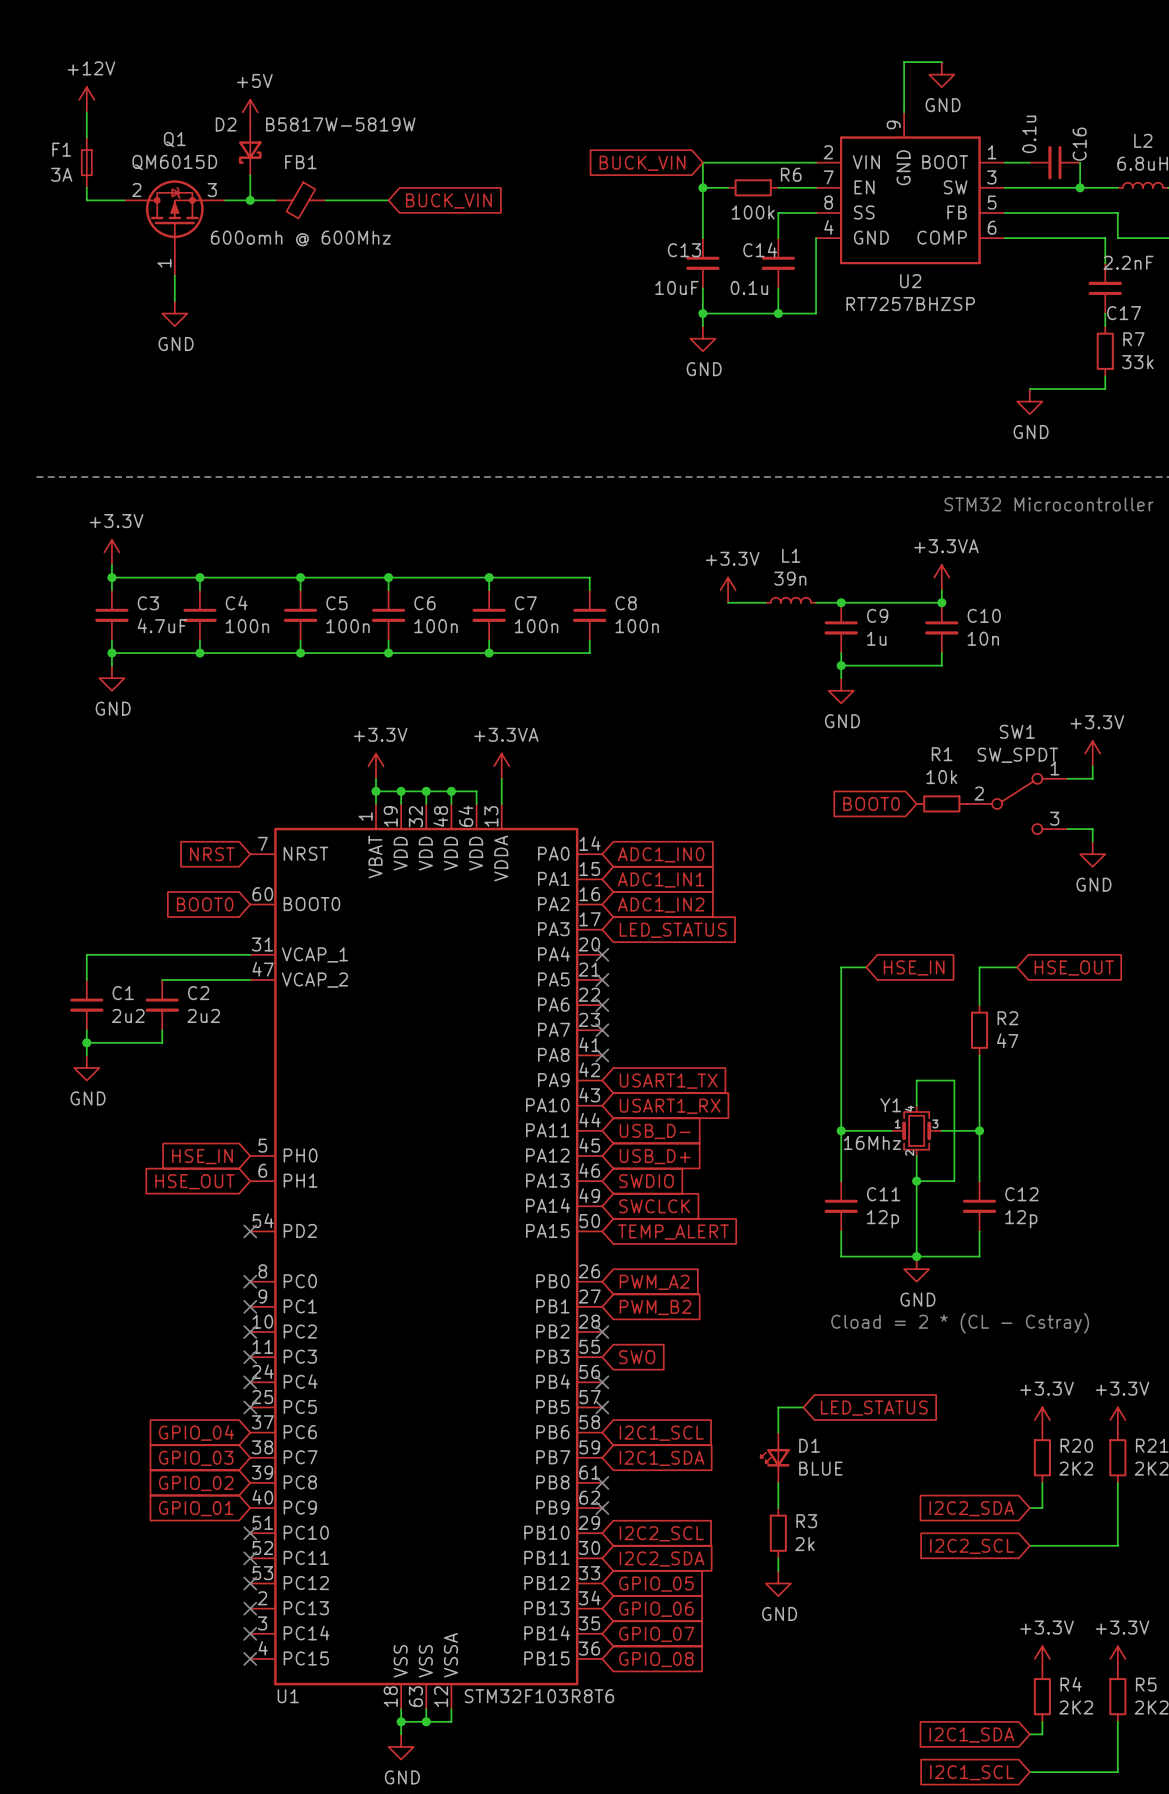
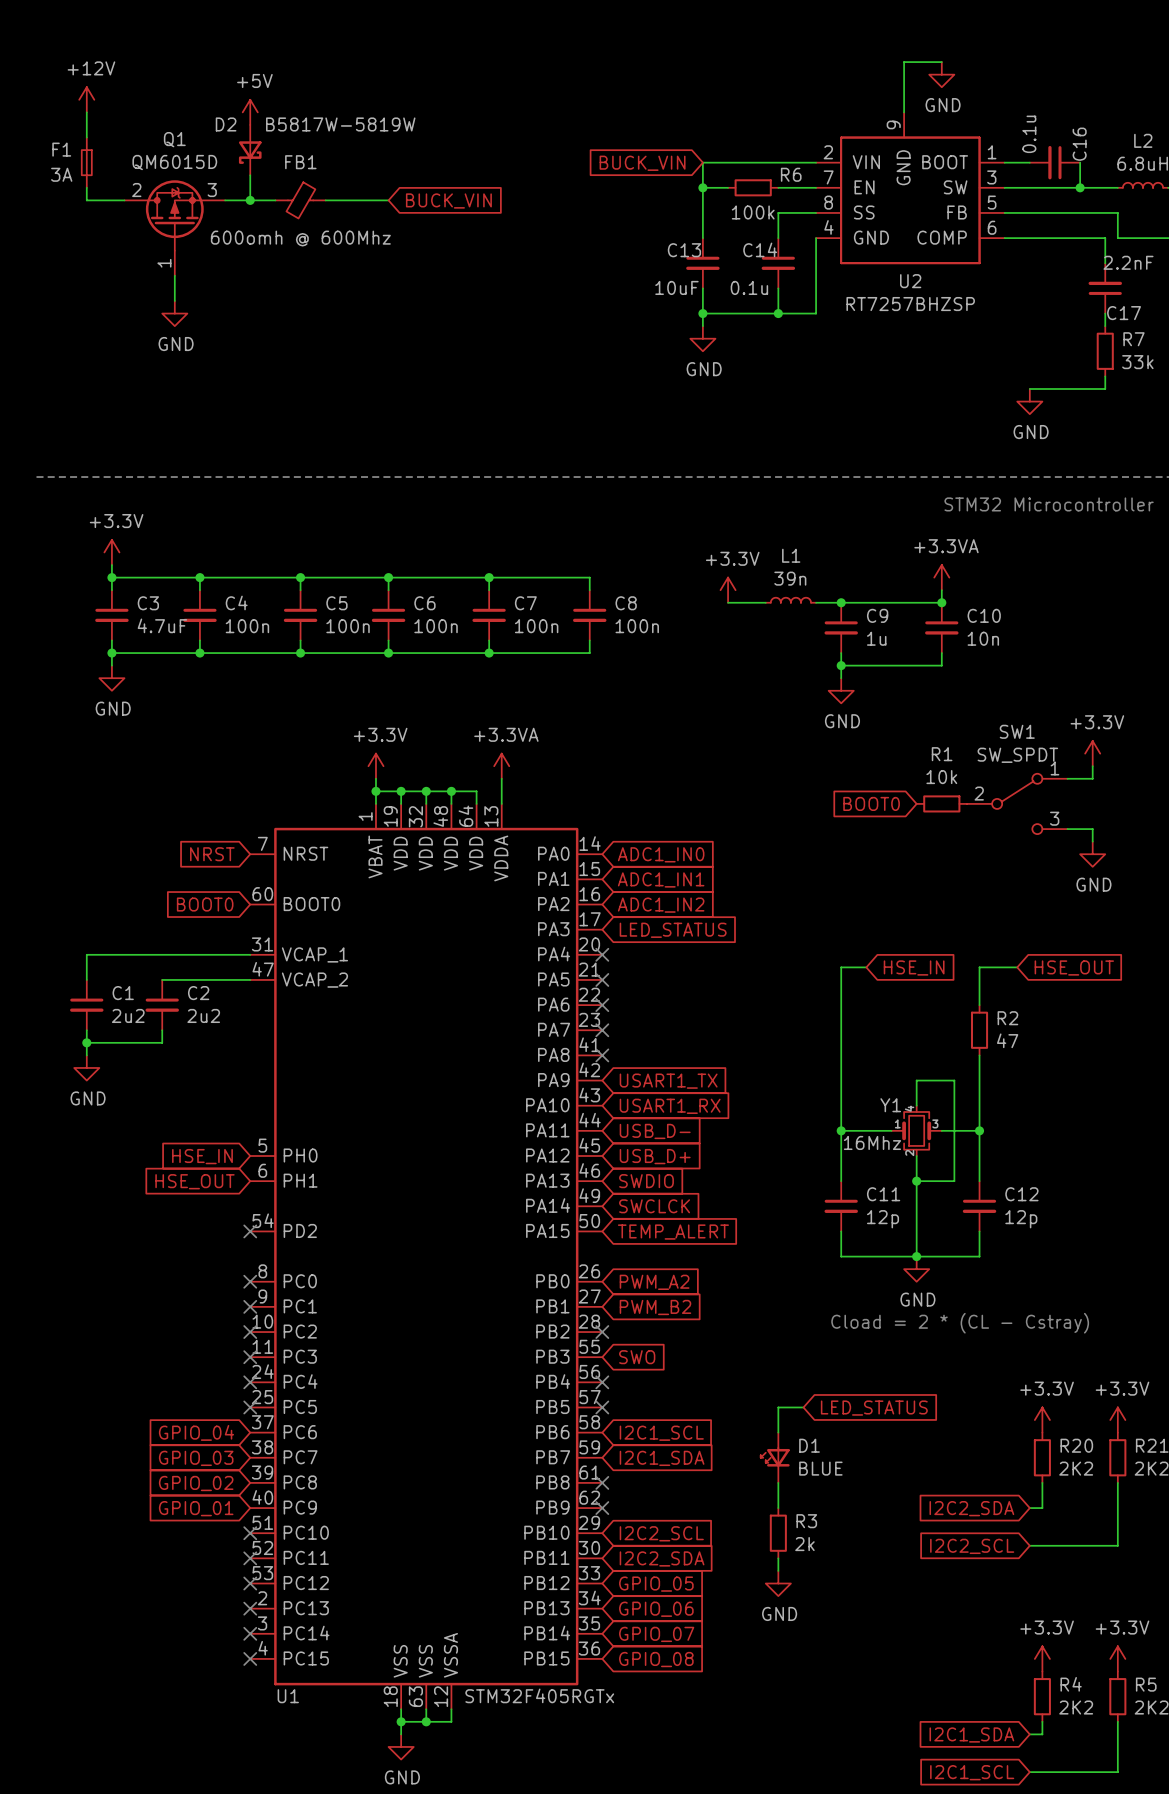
U1 value: STM32F103R8T6 (539, 1696) -> STM32F405RGTx (539, 1695)

